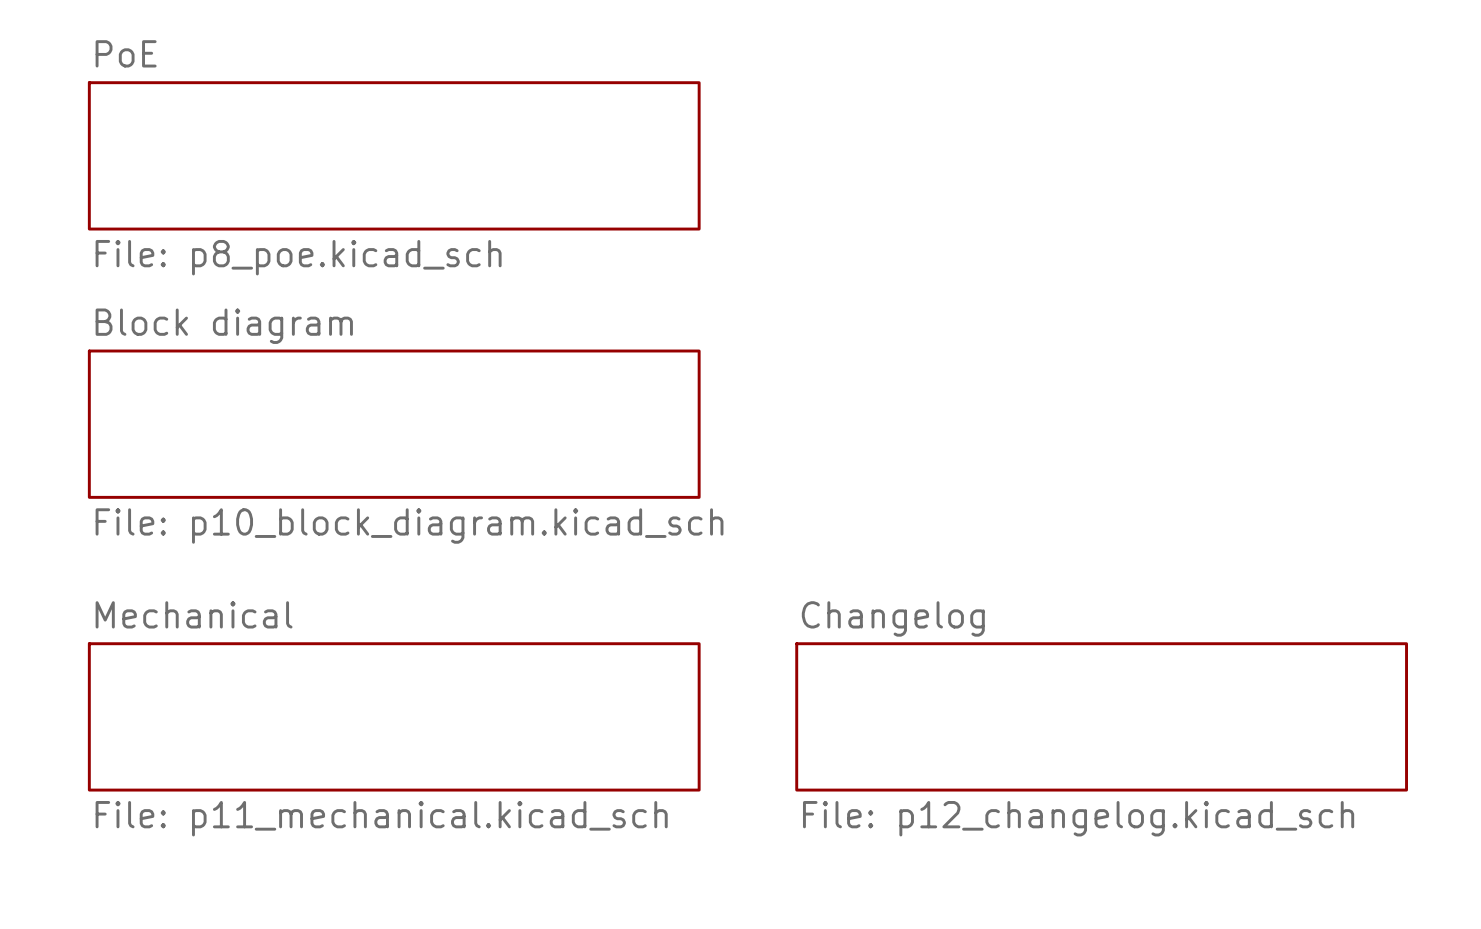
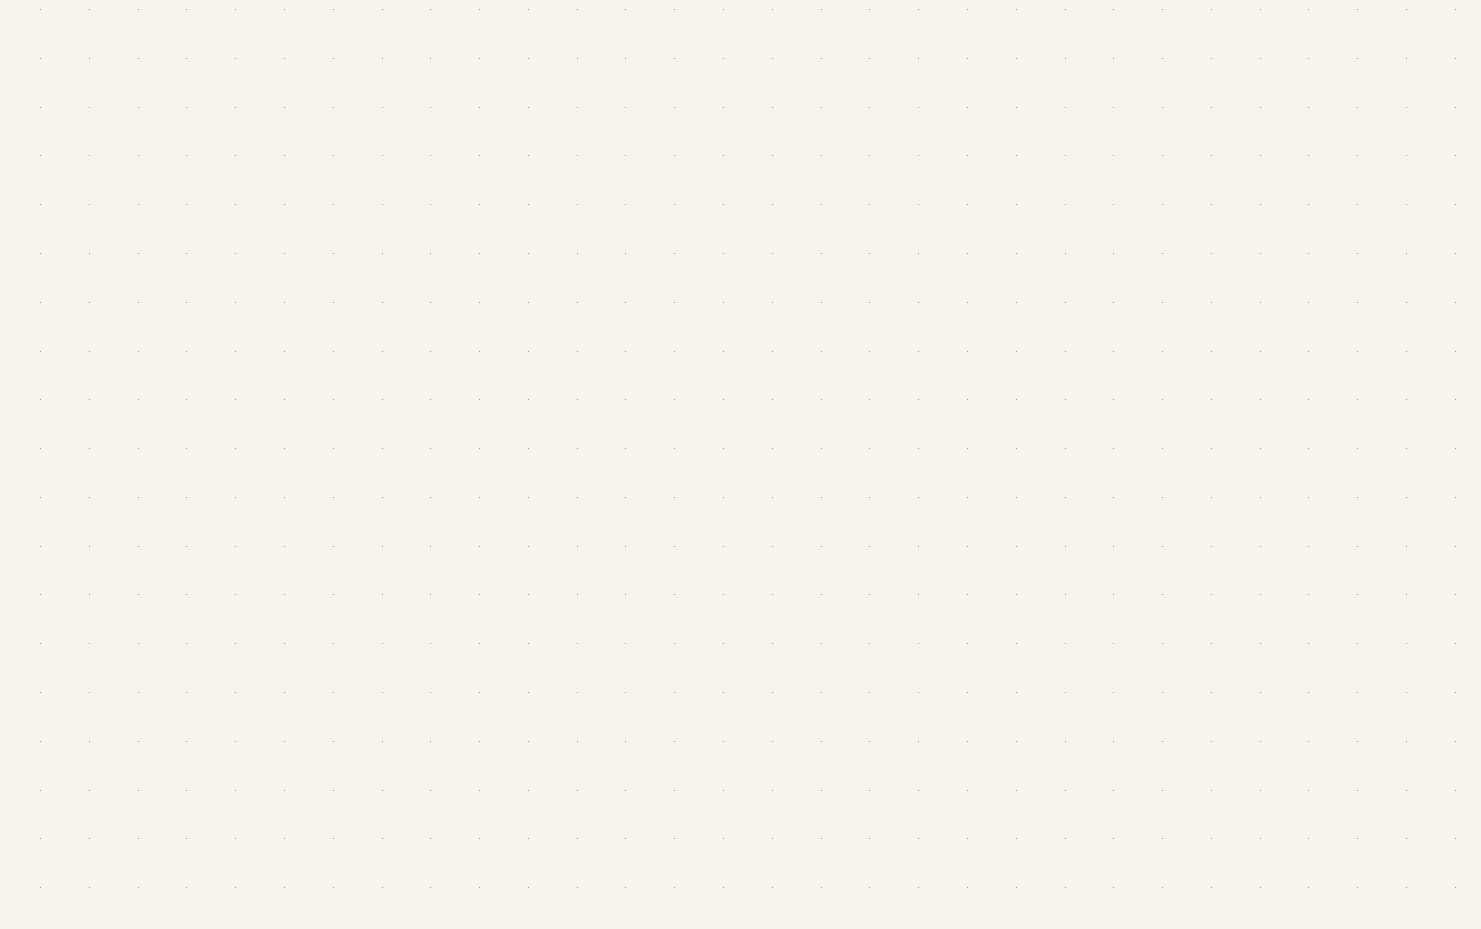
sheet PoE: File: p8_poe.kicad_sch (394, 155) -> none
sheet Block diagram: File: p10_block_diagram.kicad_sch (394, 424) -> none
sheet Mechanical: File: p11_mechanical.kicad_sch (394, 716) -> none
sheet Changelog: File: p12_changelog.kicad_sch (1101, 716) -> none

